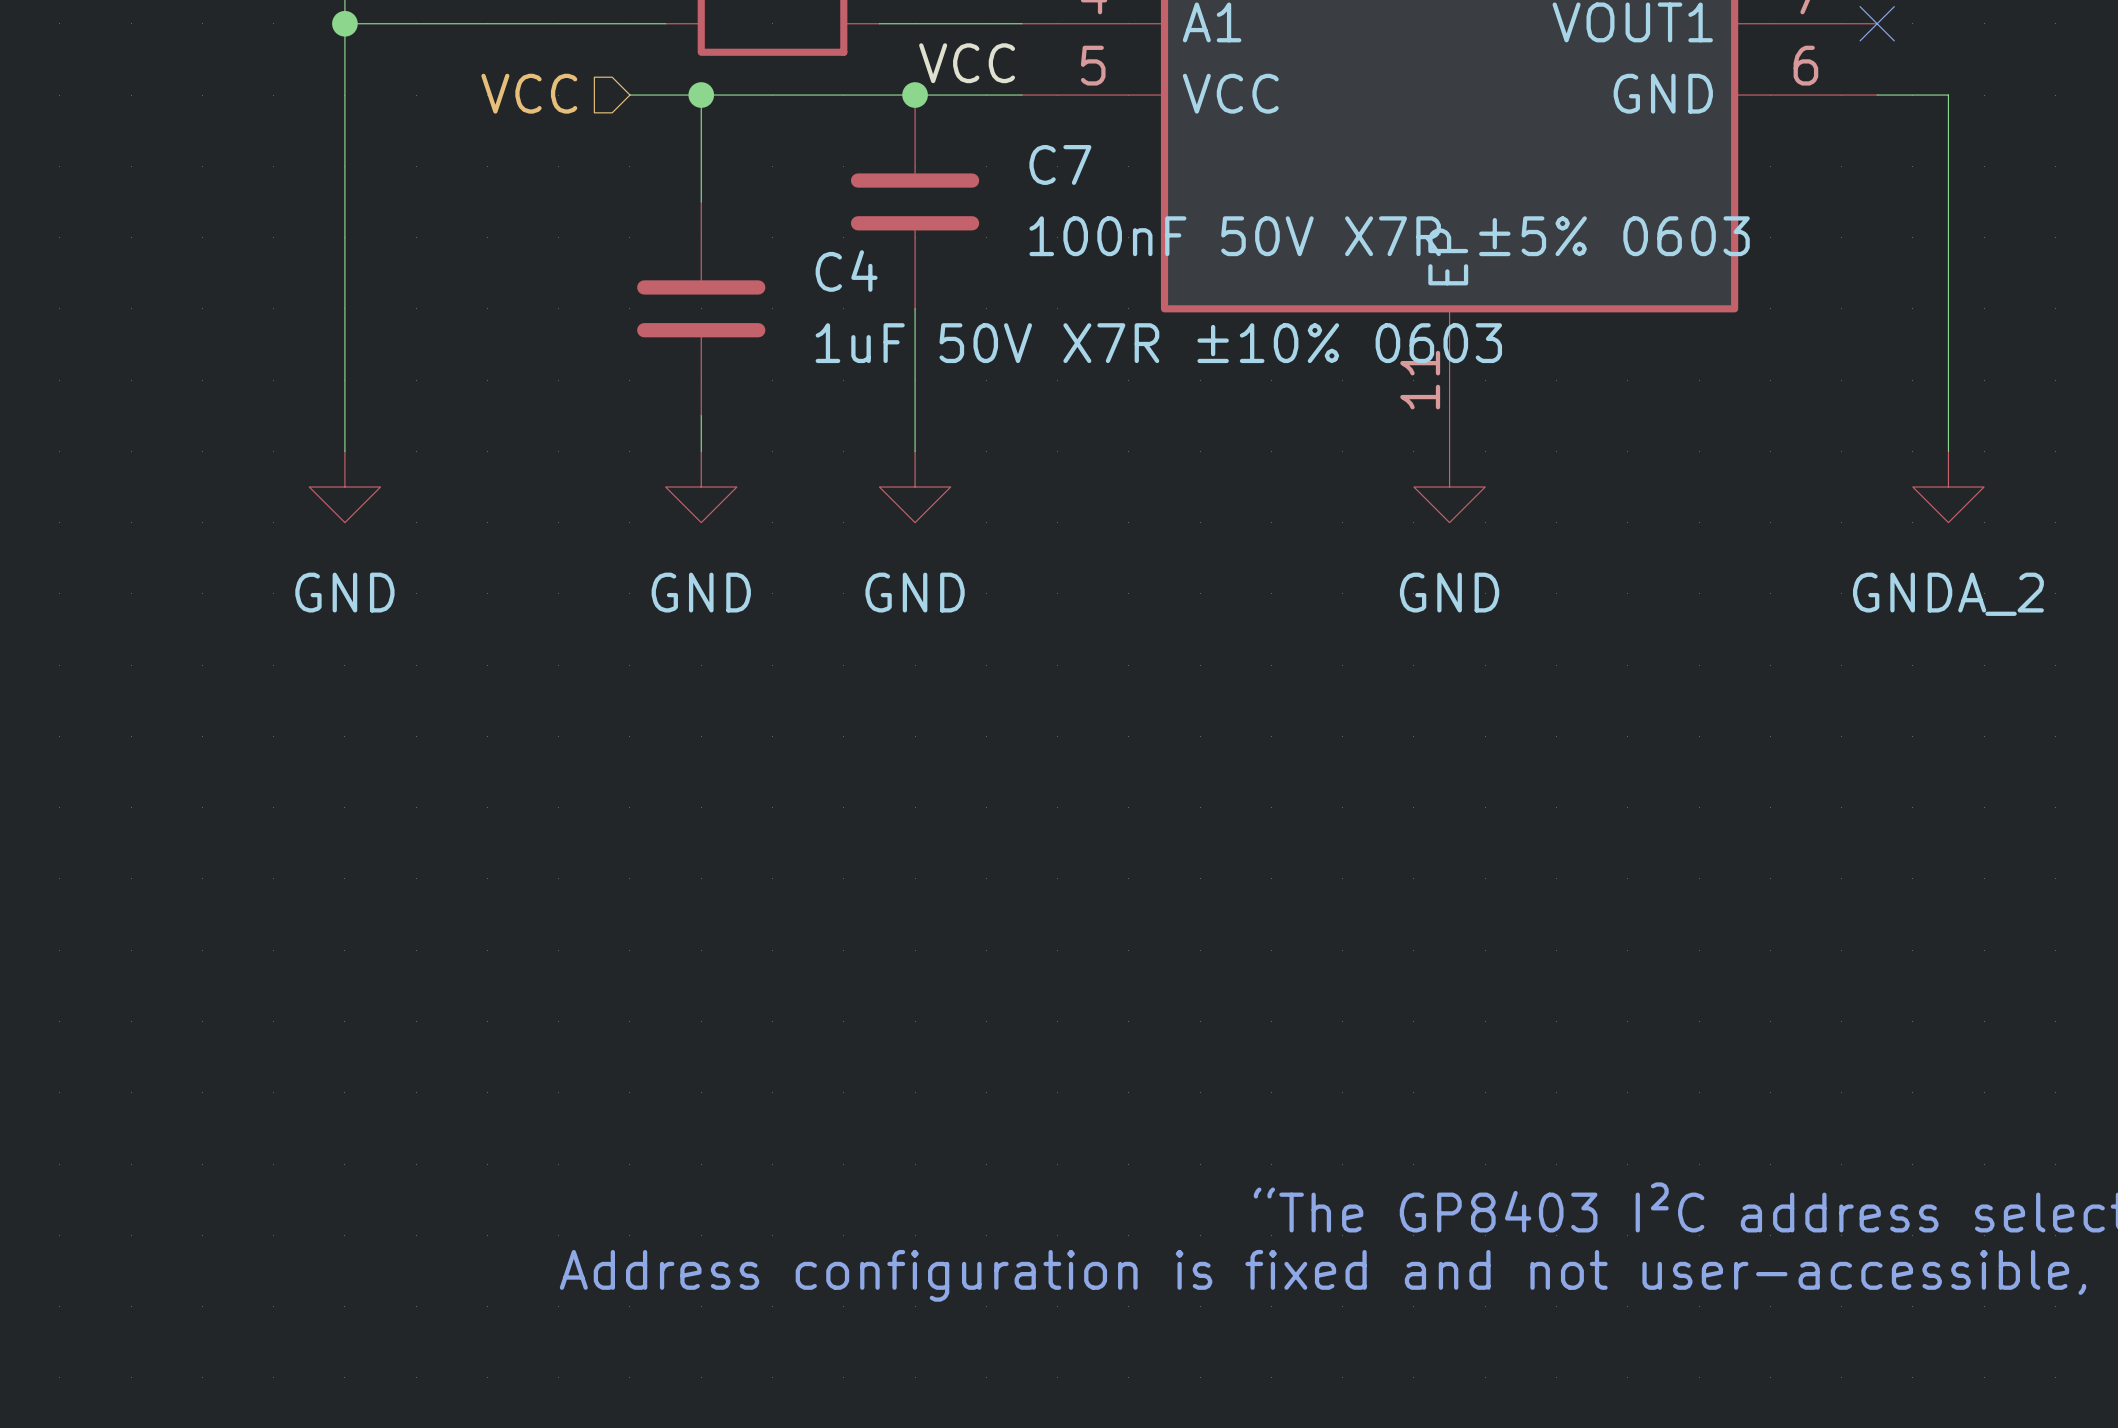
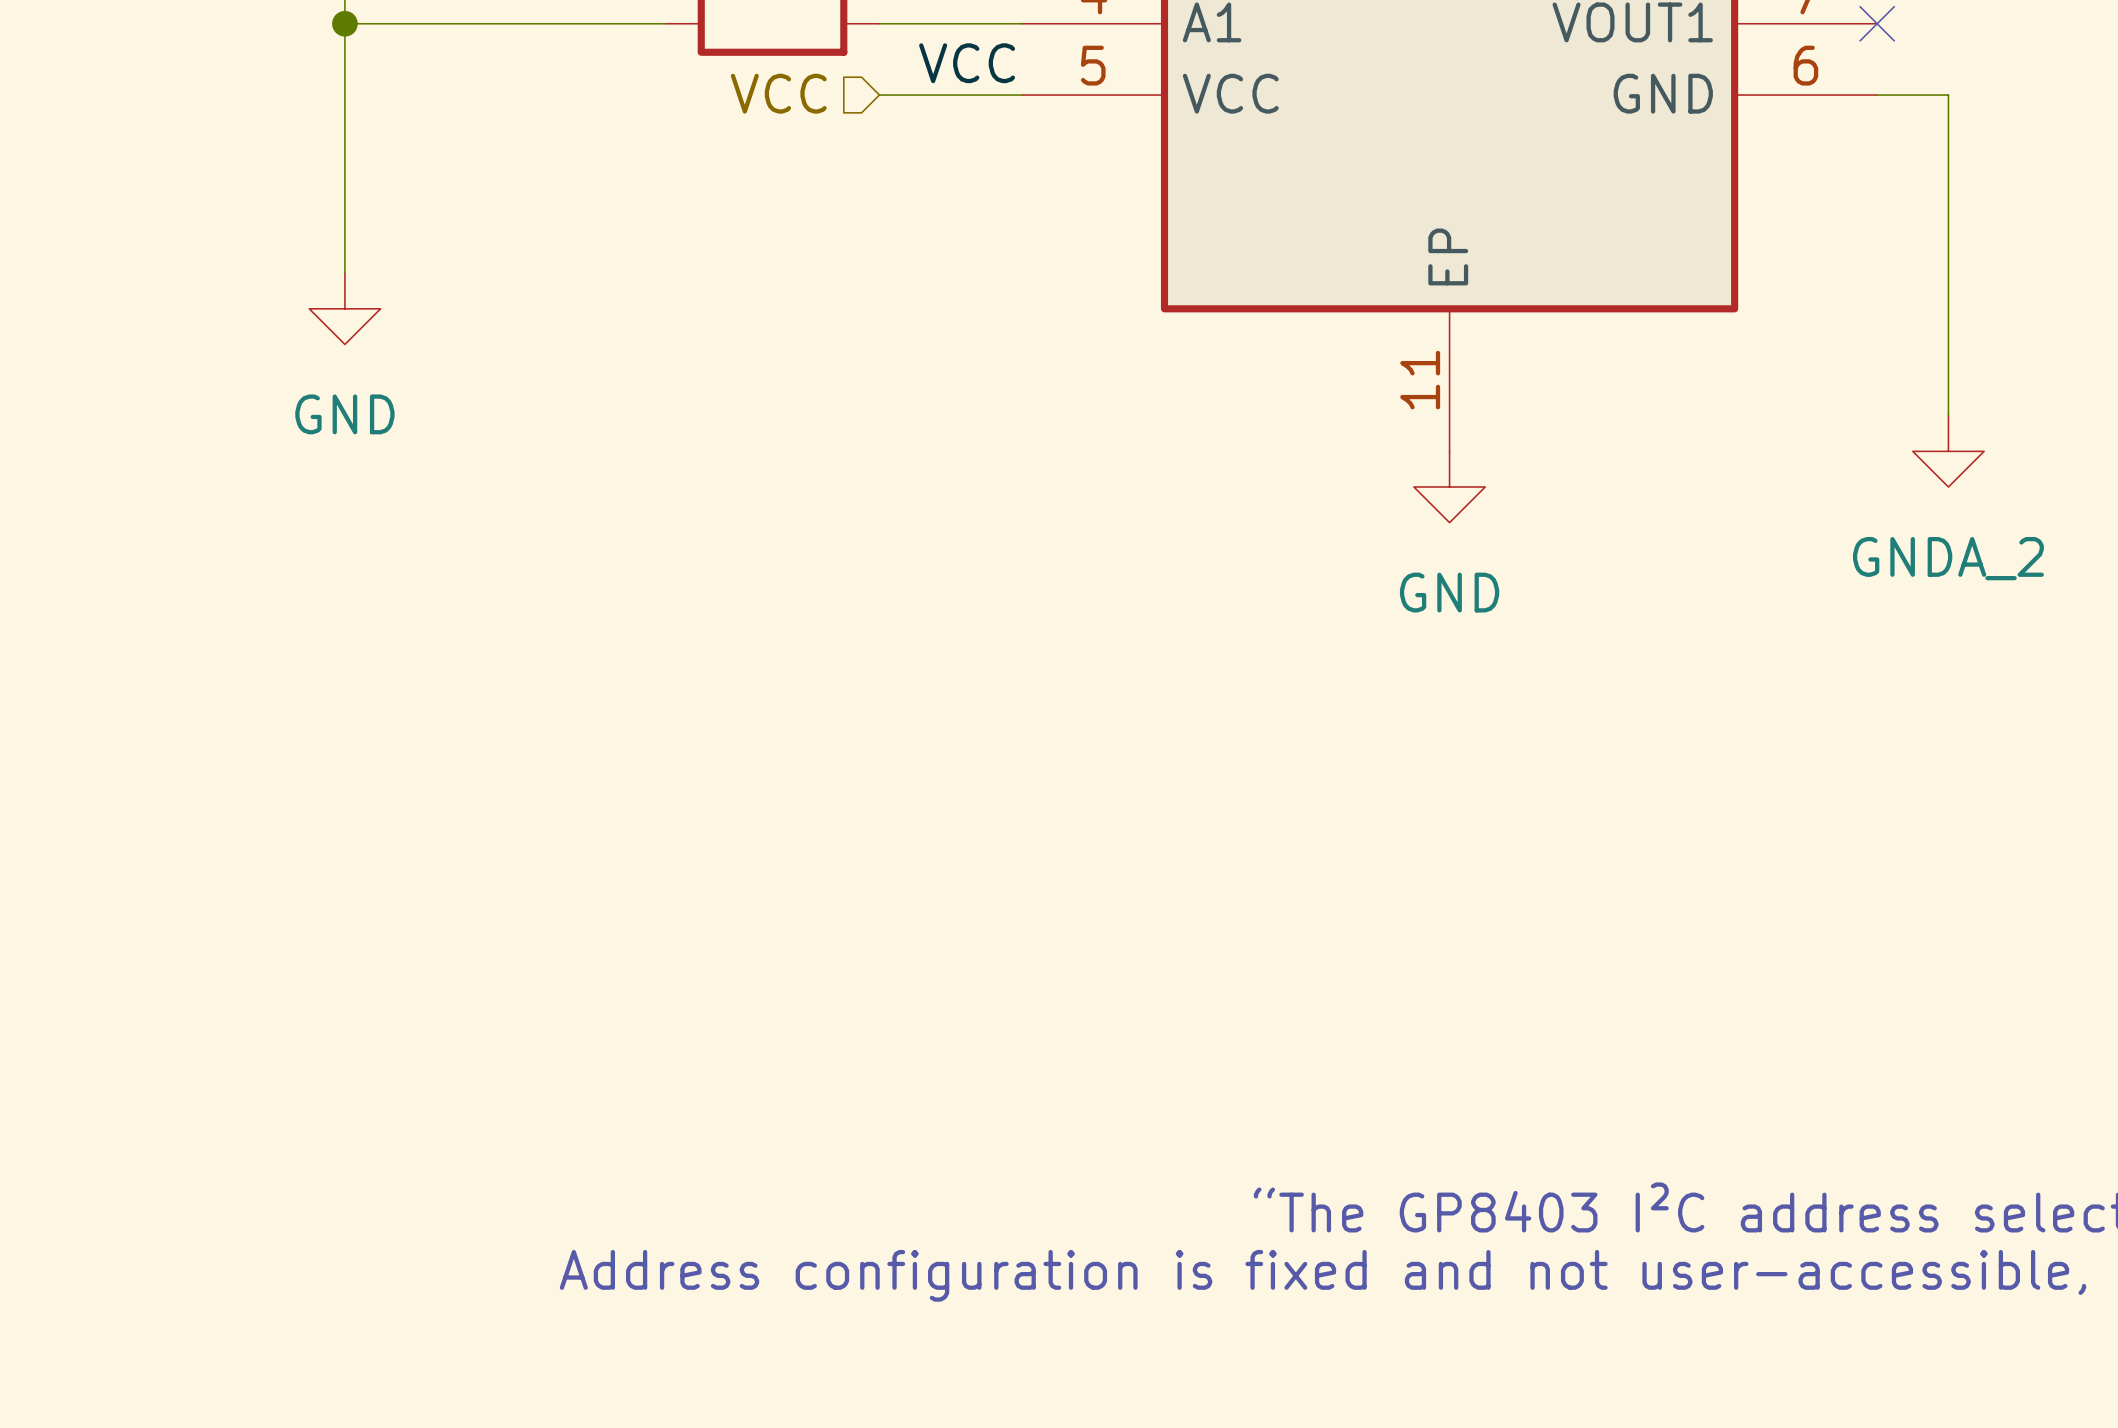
hierarchical label position: VCC (529, 93) -> VCC (778, 93)
wire: (629, 95) (879, 95) -> none
wire: (701, 95) (701, 201) -> none
junction: (701, 95) -> none
junction: (915, 95) -> none
C7: 100nF 50V X7R ±5% 0603 (915, 201) -> none
wire: (344, 273) (344, 451) -> none
C4: 1uF 50V X7R ±10% 0603 (701, 308) -> none
wire: (915, 308) (915, 451) -> none
wire: (701, 415) (701, 451) -> none
power symbol position: GND (344, 486) -> GND (344, 308)
power symbol: GND (701, 486) -> none
power symbol: GND (915, 486) -> none
power symbol position: GNDA_2 (1948, 486) -> GNDA_2 (1948, 451)

